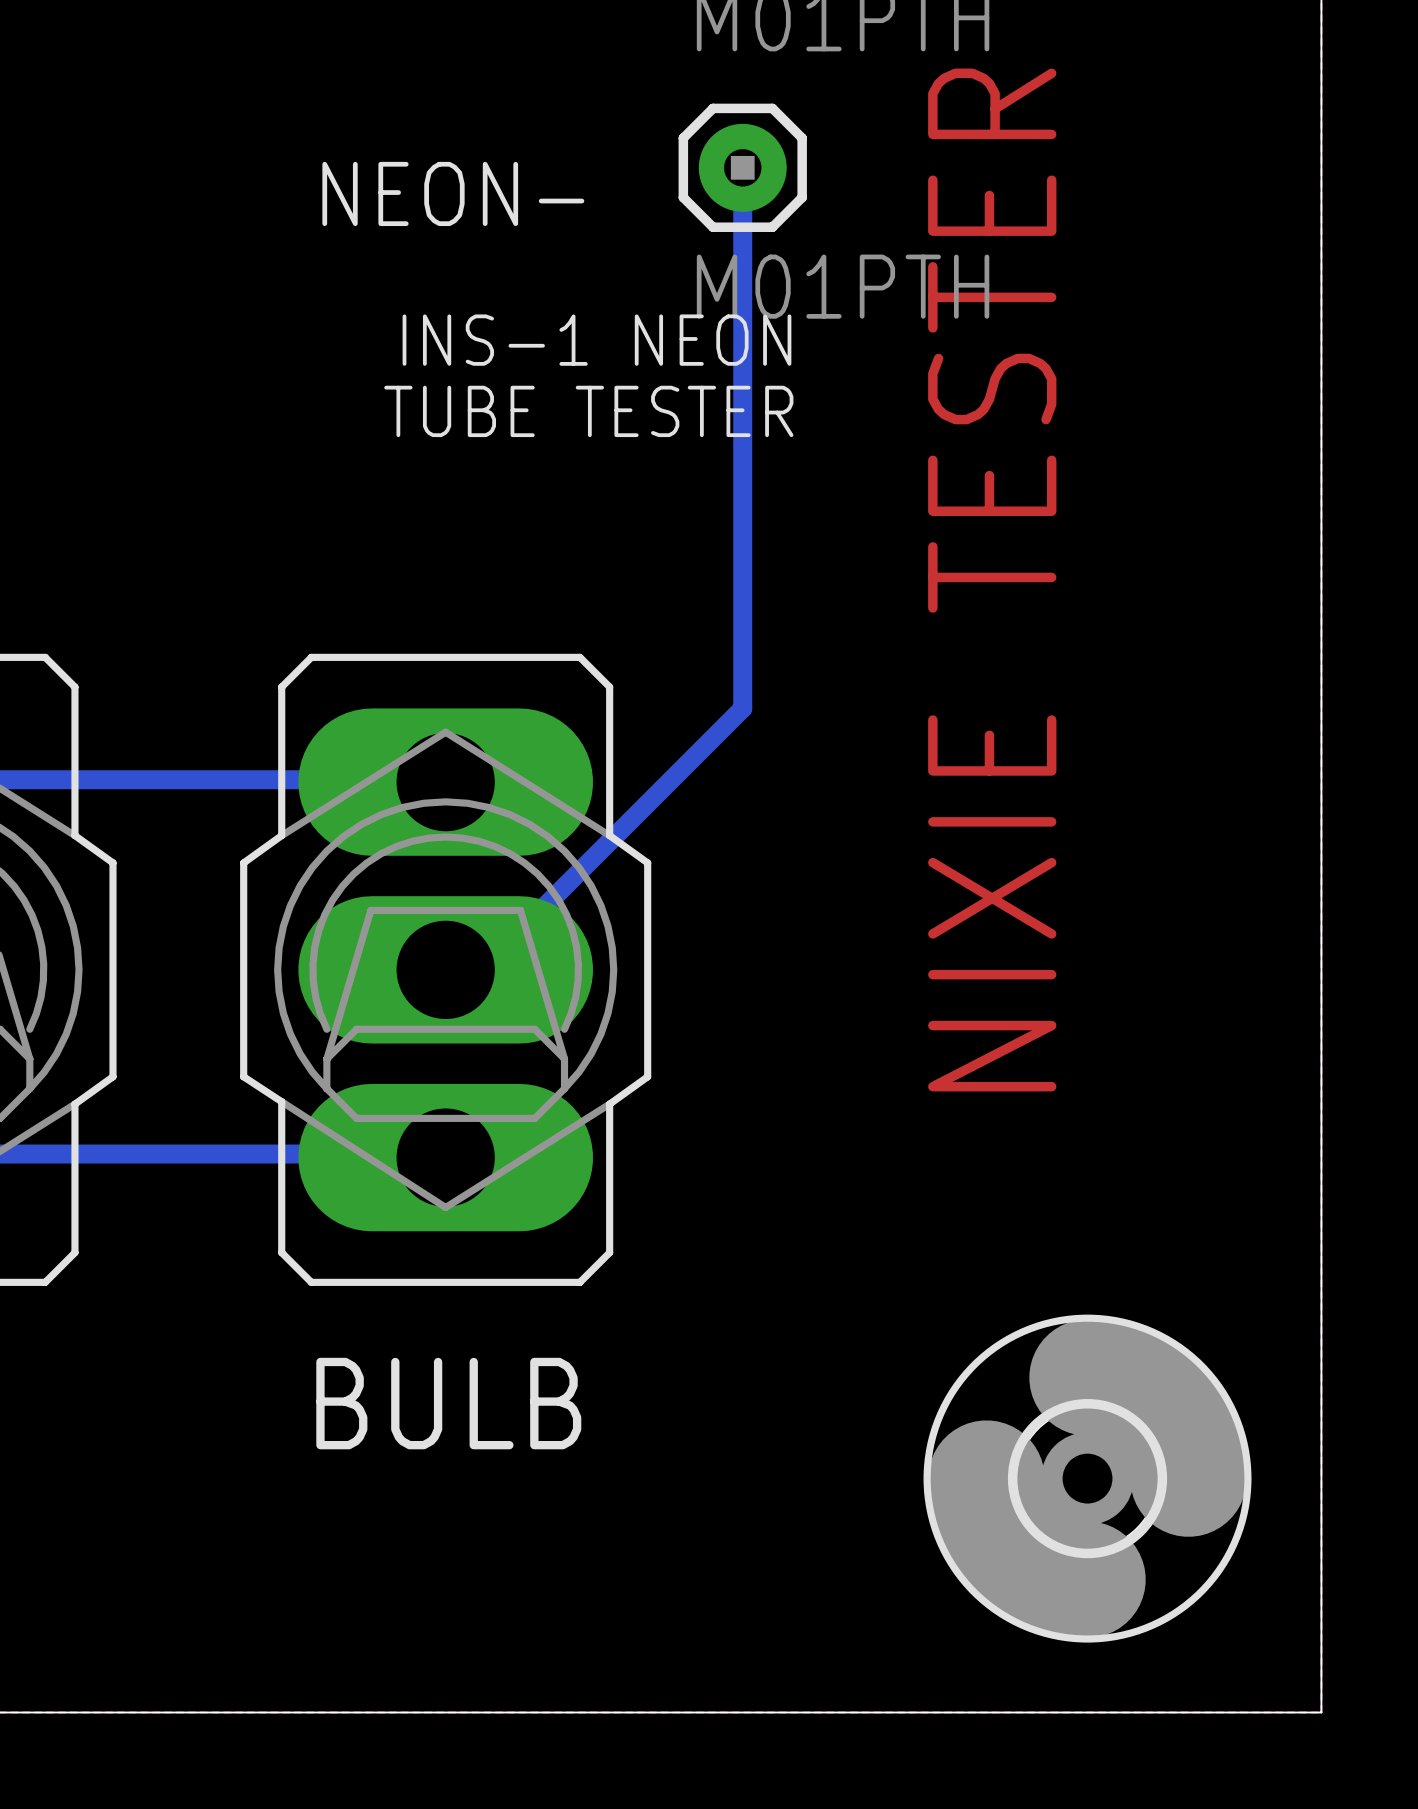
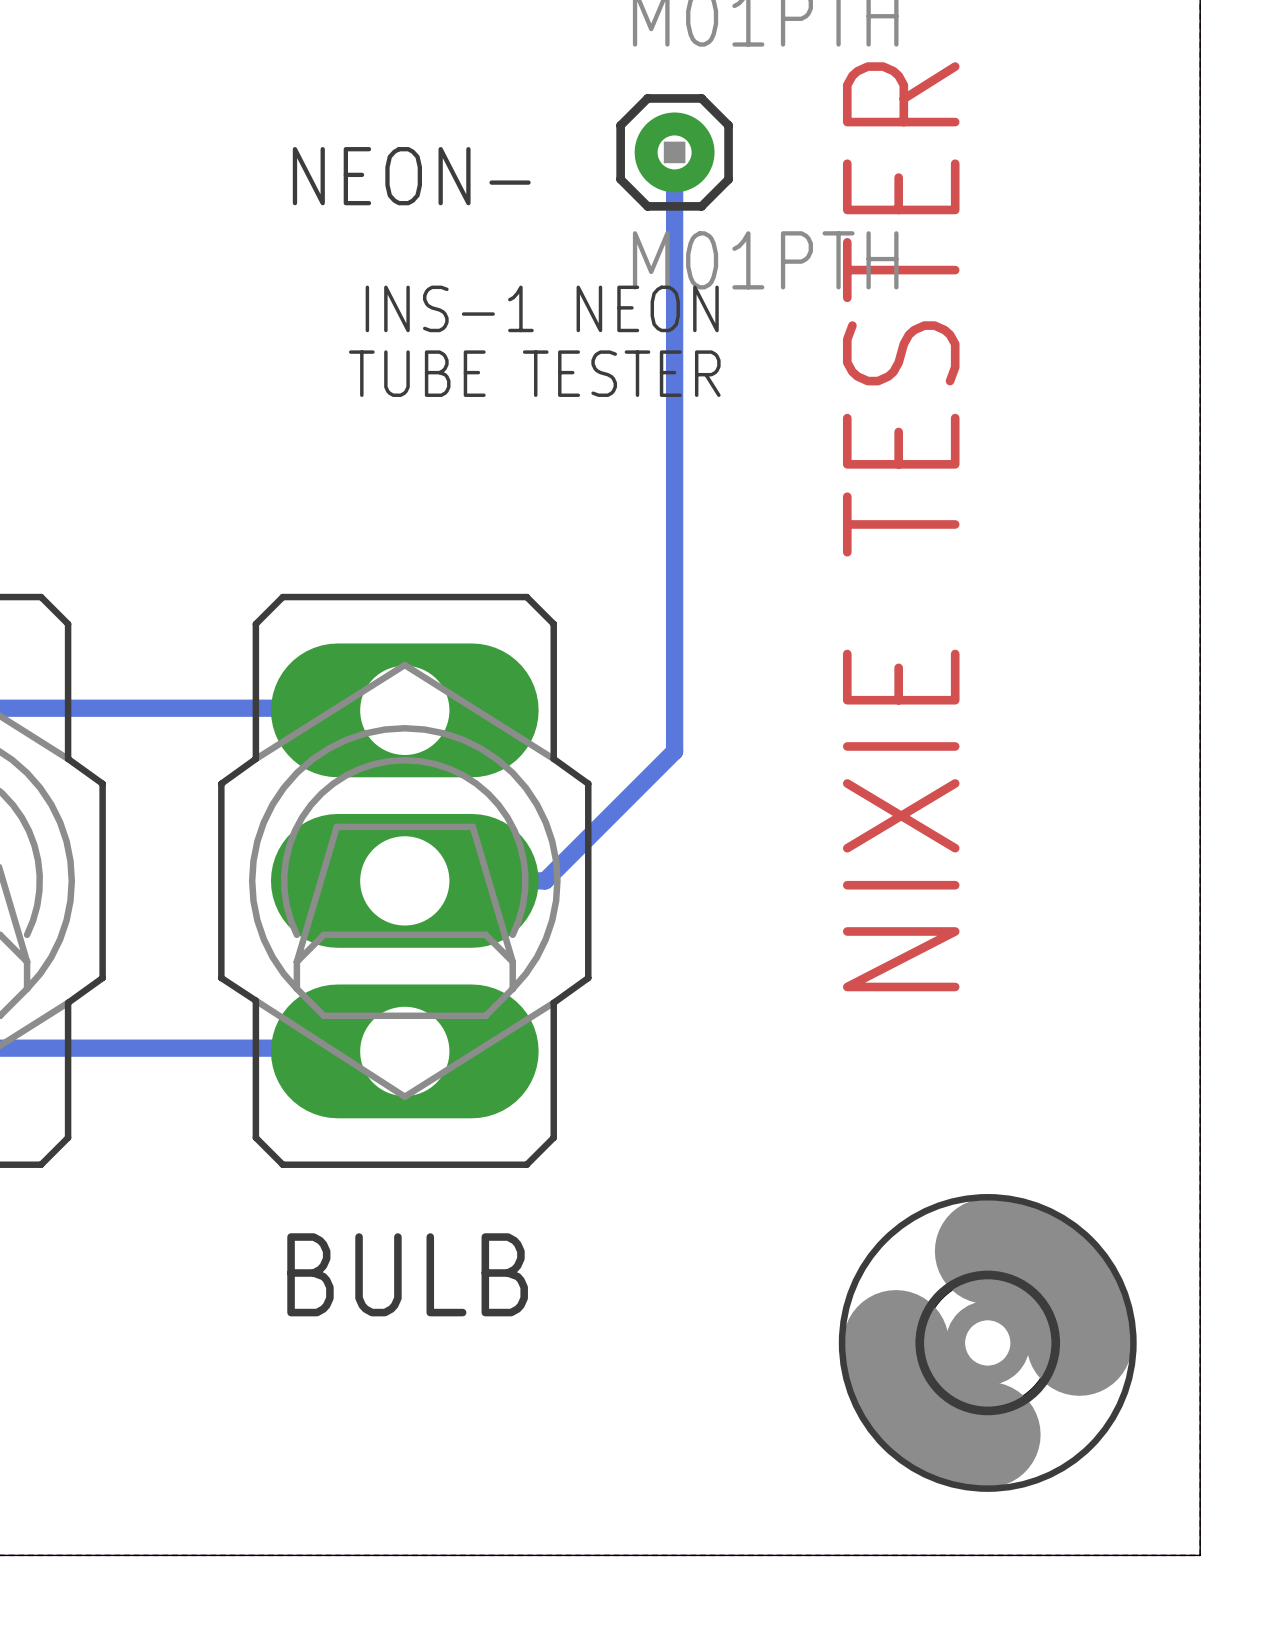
bottom track: (742, 708) (481, 969) -> (674, 643) (674, 751) (545, 880) (437, 880)

